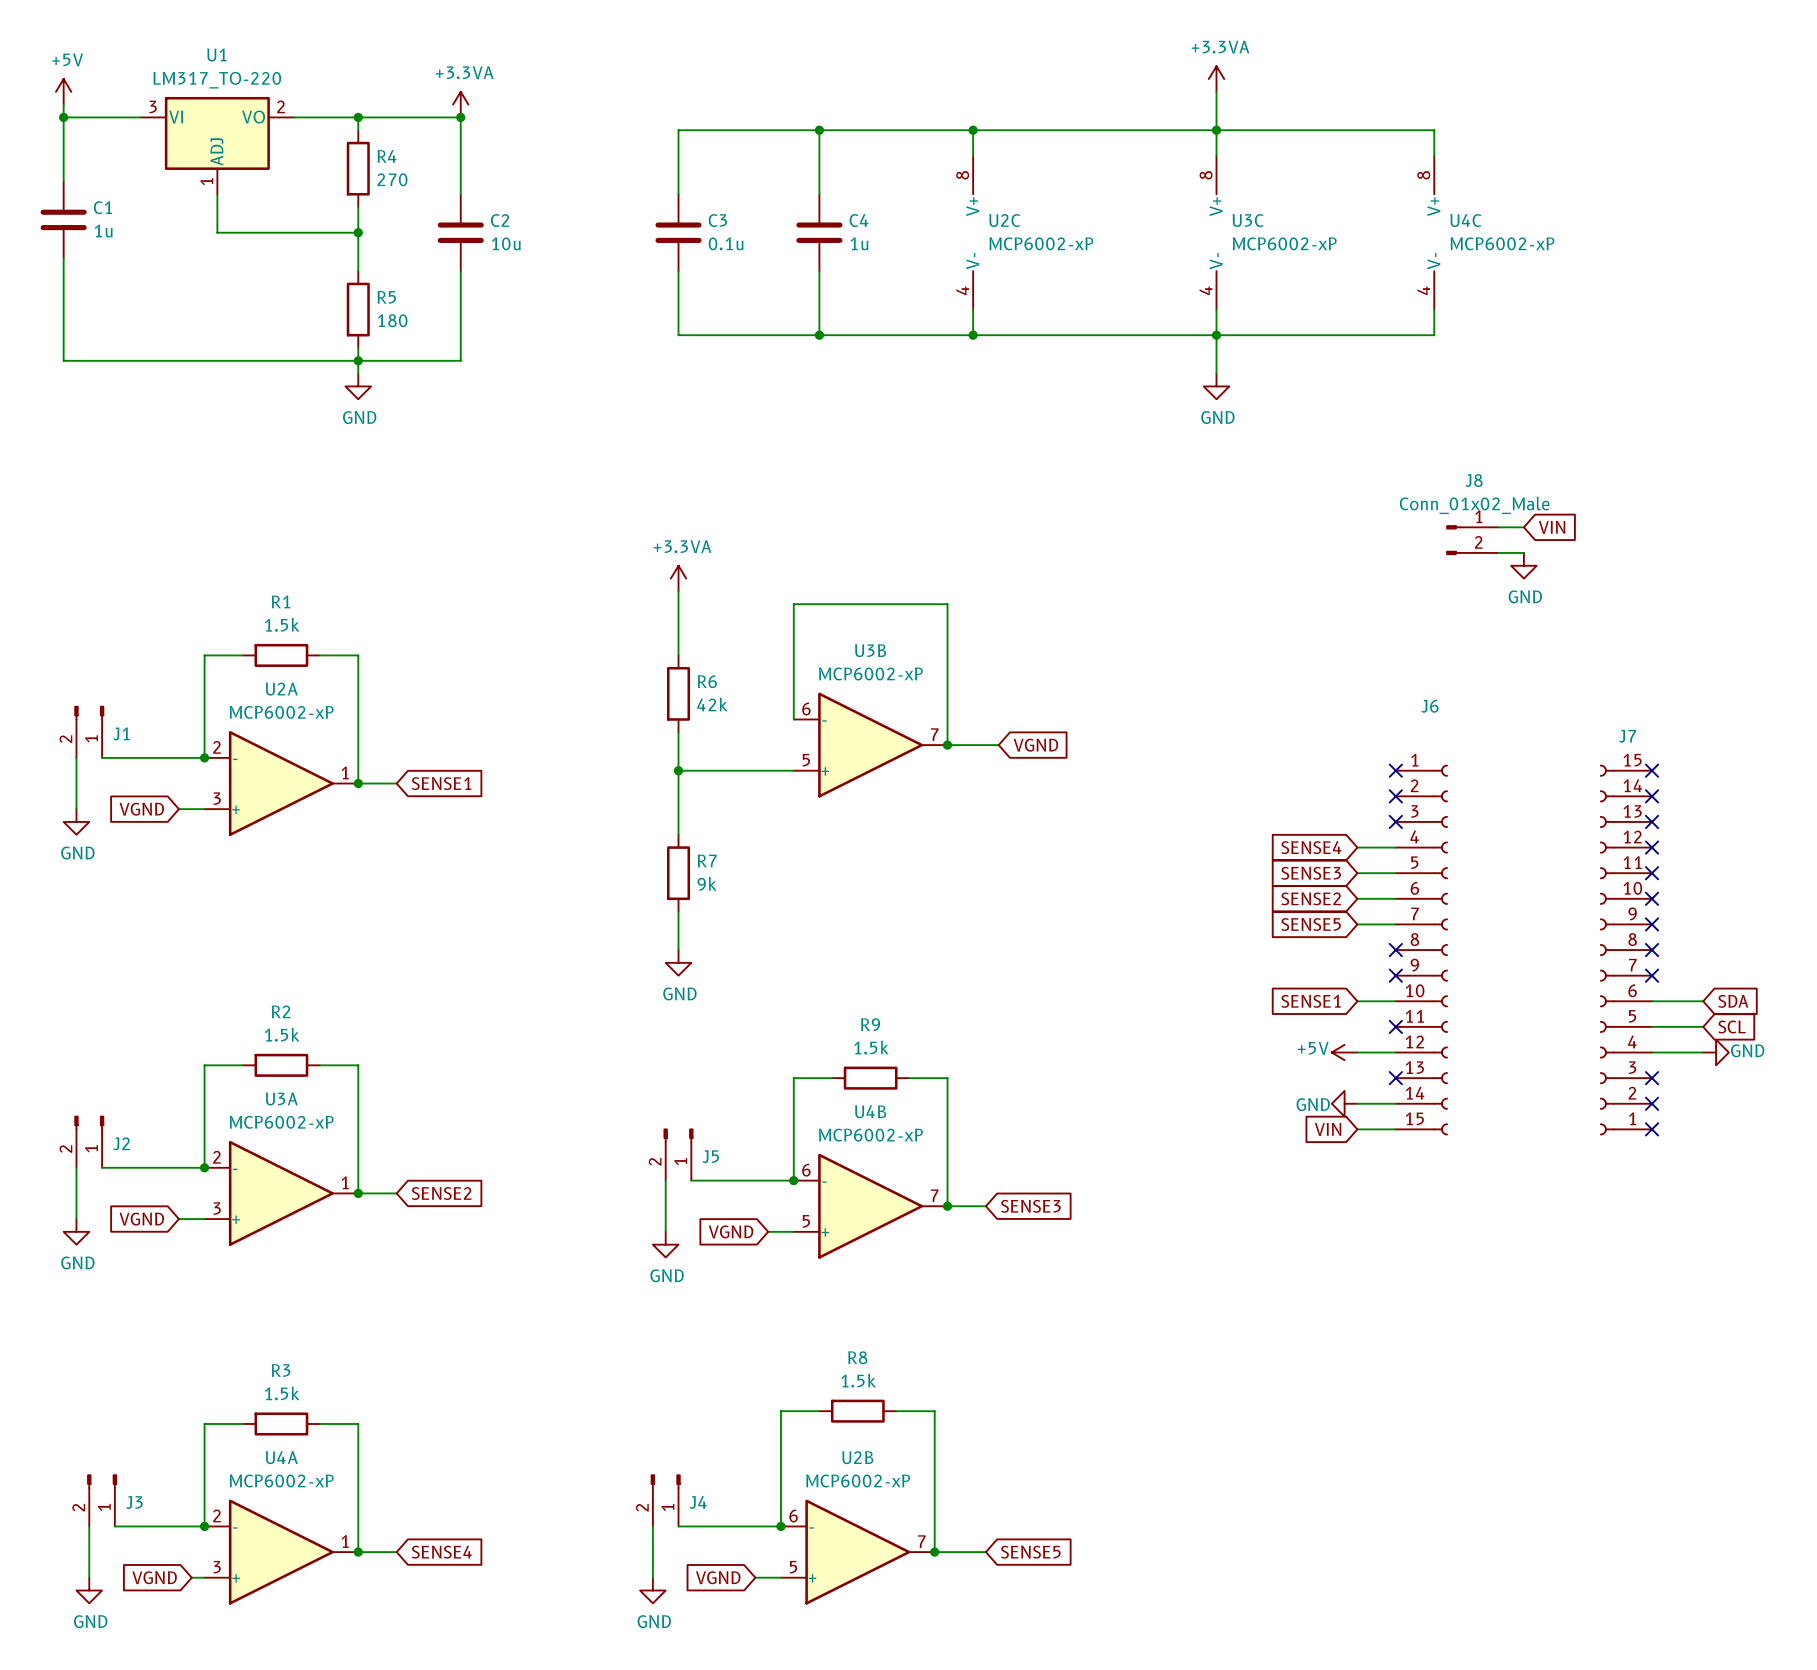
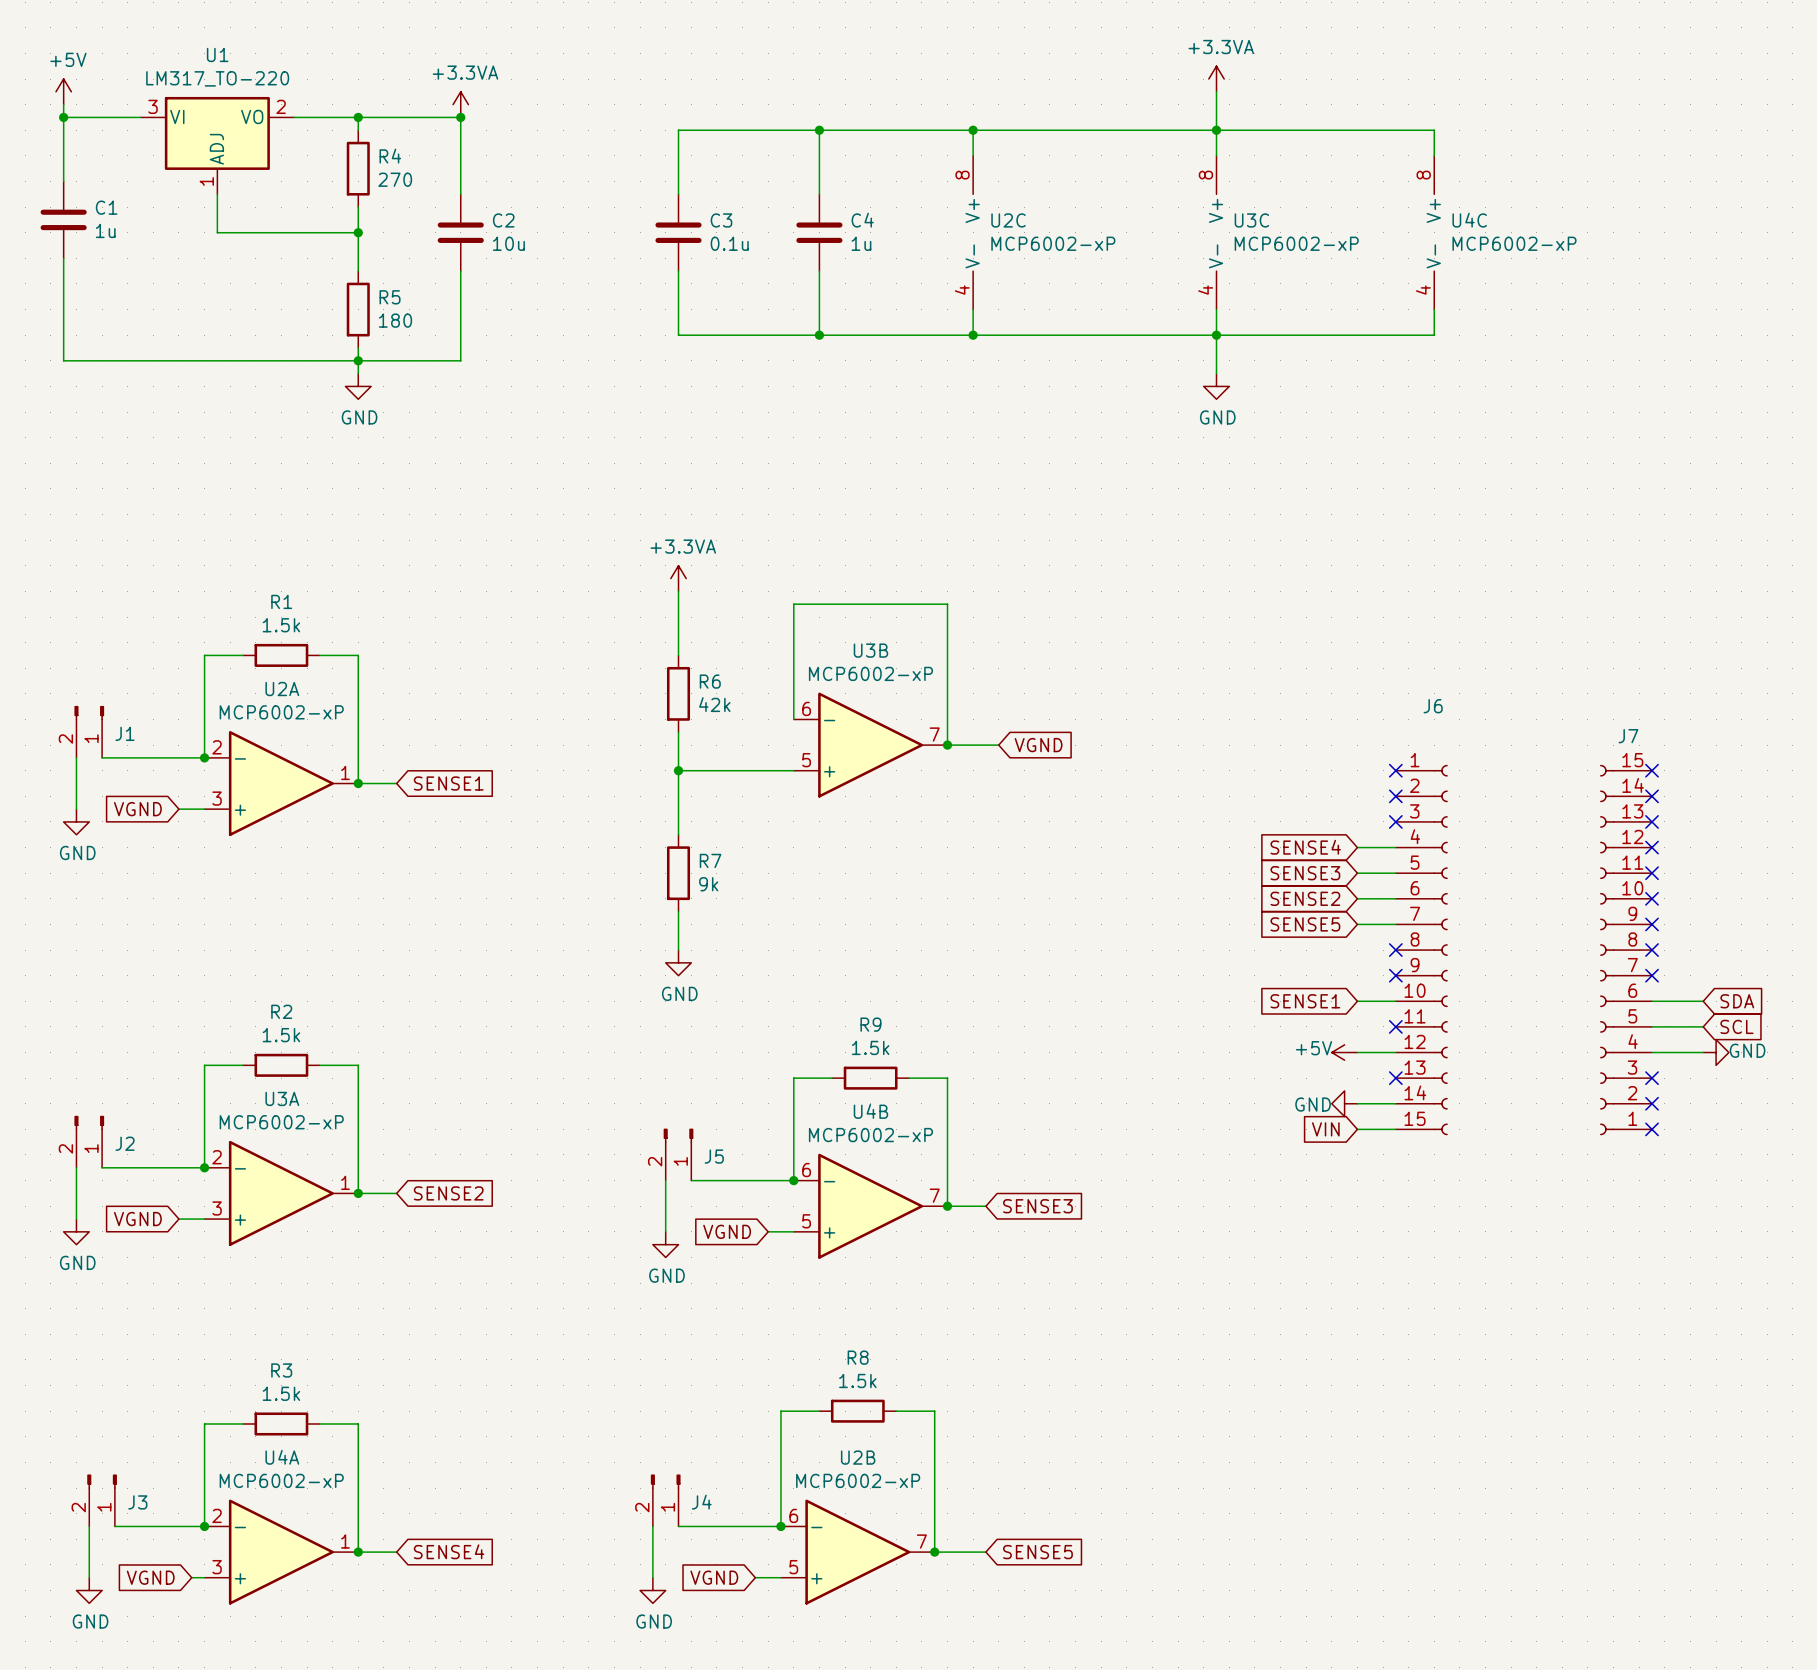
wire: (1498, 527) (1523, 527) -> none
global label: VIN (1552, 527) -> none
J8: Conn_01x02_Male (1472, 540) -> none
wire: (1498, 552) (1523, 552) -> none
power symbol: GND (1523, 565) -> none

